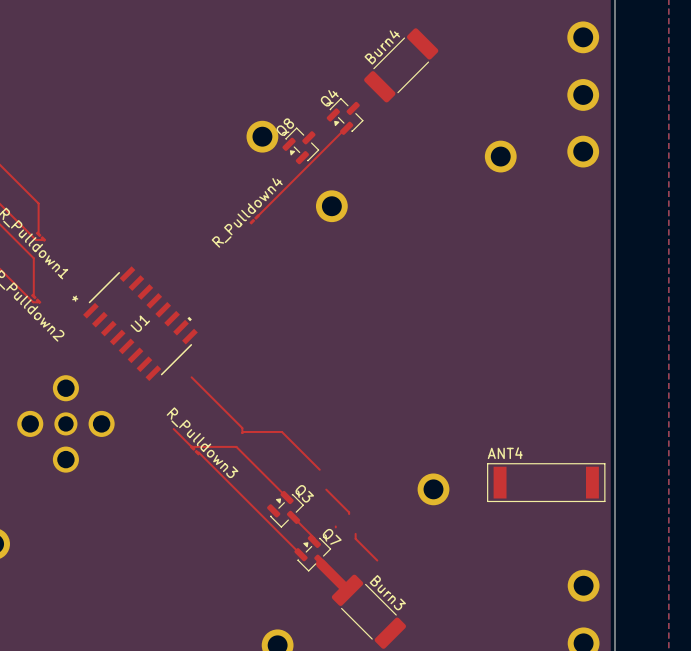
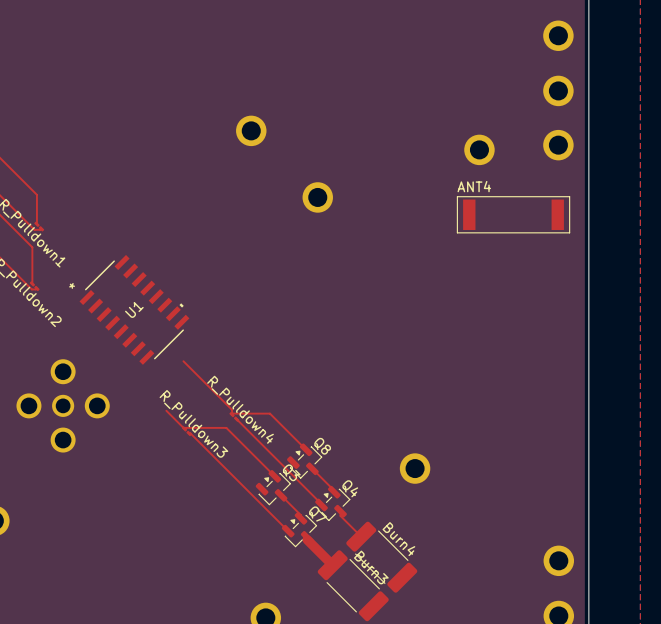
Burn4 rotation: 0° (401, 65) -> 90° clockwise (381, 557)
Burn4 position: (401, 65) -> (381, 557)
Q4 rotation: 0° (345, 116) -> 90° clockwise (332, 503)
Q4 position: (345, 116) -> (332, 503)
top track: (345, 128) (257, 216) -> none
Q8 rotation: 0° (300, 145) -> 90° clockwise (304, 461)
Q8 position: (300, 145) -> (304, 461)
R_Pulldown4 rotation: 0° (254, 219) -> 90° clockwise (234, 416)
R_Pulldown4 position: (254, 219) -> (234, 416)
top track: none -> (236, 419) (321, 504)
ANT4 position: (546, 482) -> (513, 214)

